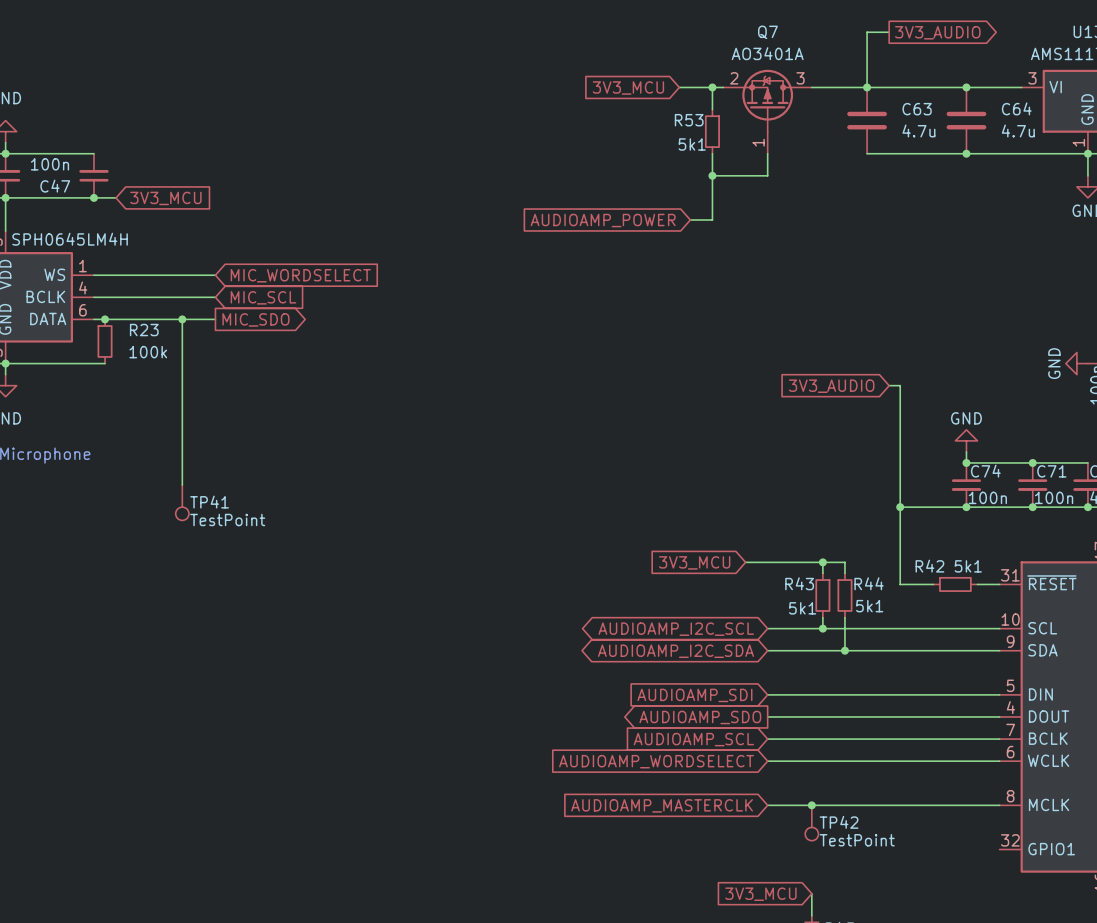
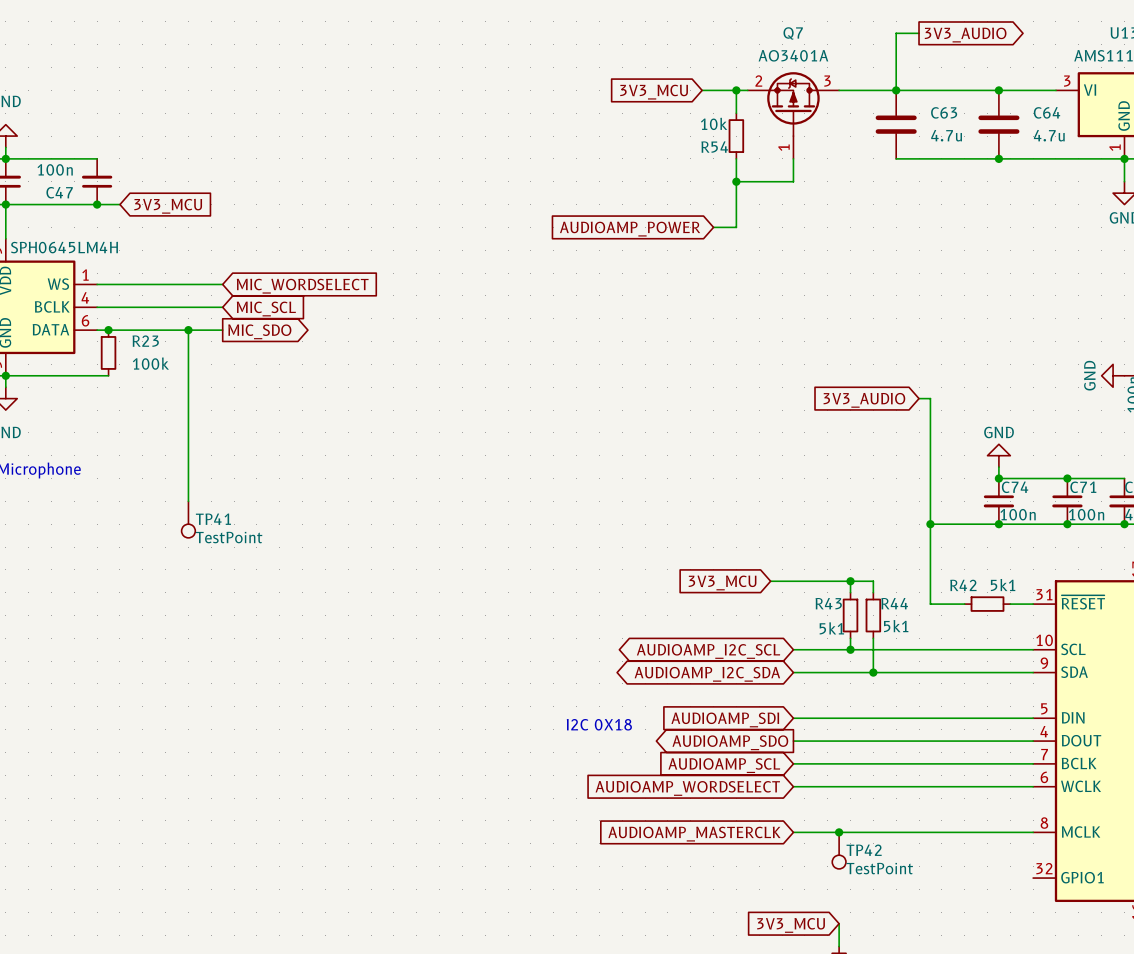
R53 name: R53 (689, 120) -> R54 (714, 147)
R53 value: 5k1 (692, 144) -> 10k (714, 123)
text: none -> I2C 0X18 (599, 724)

